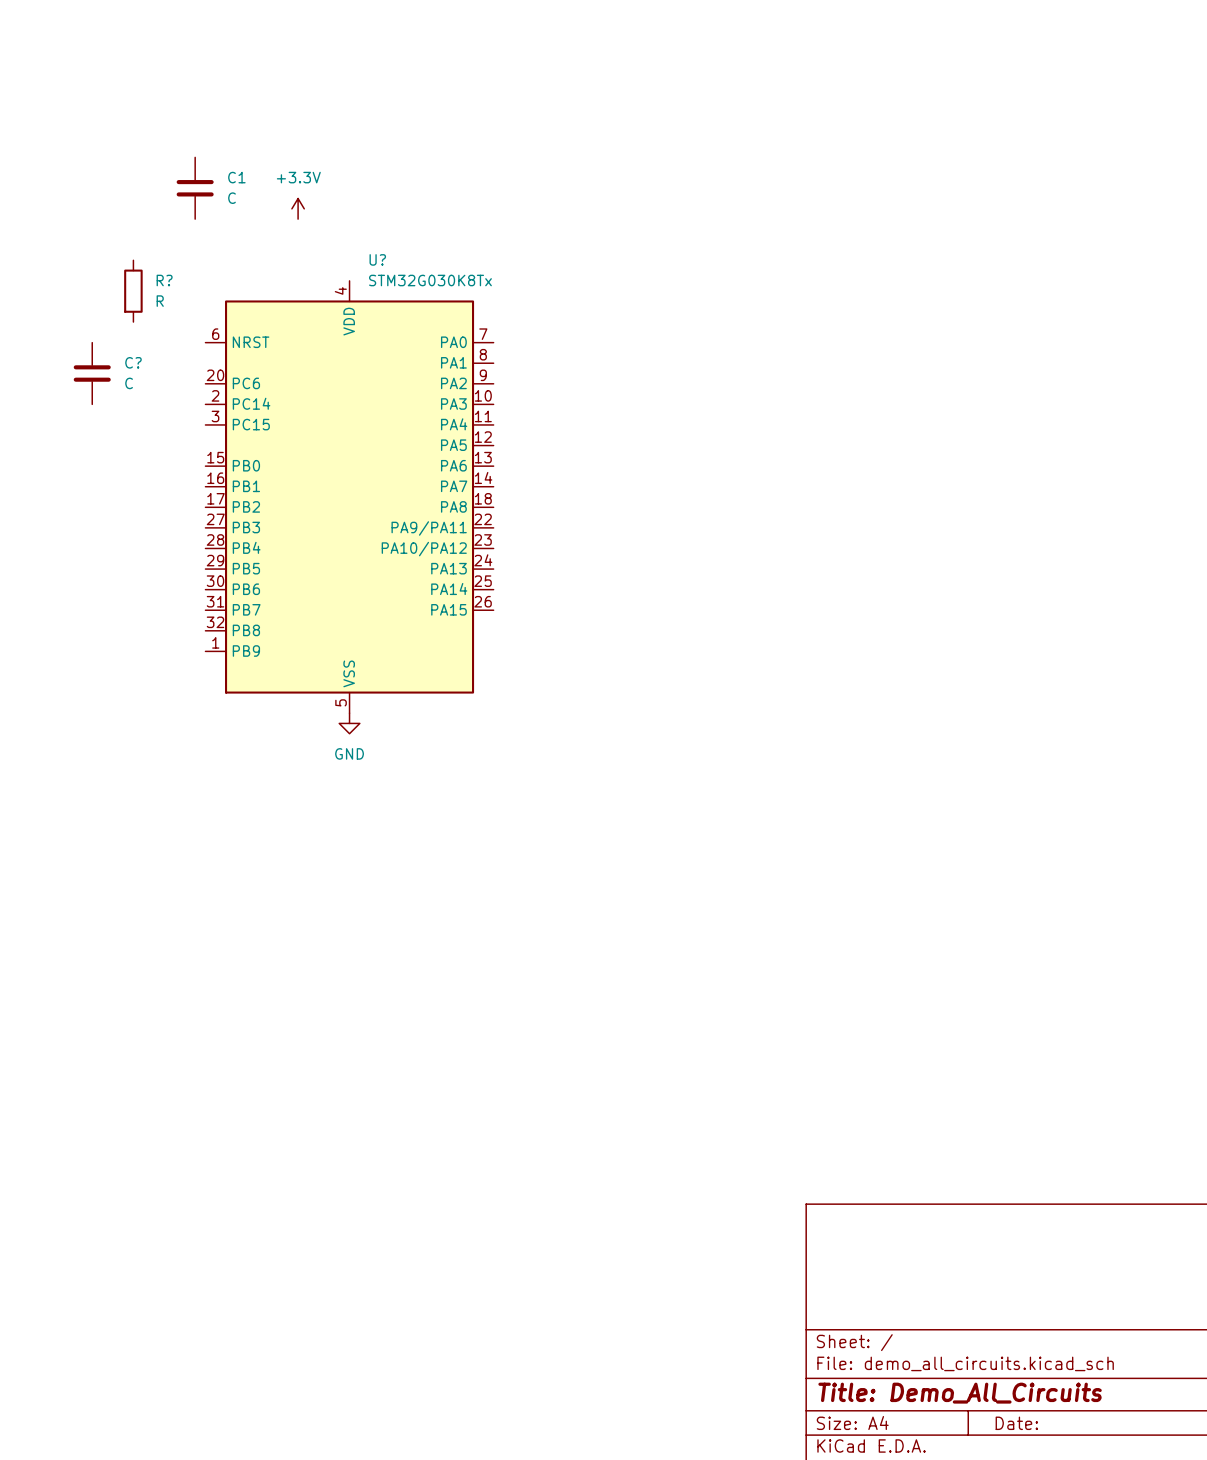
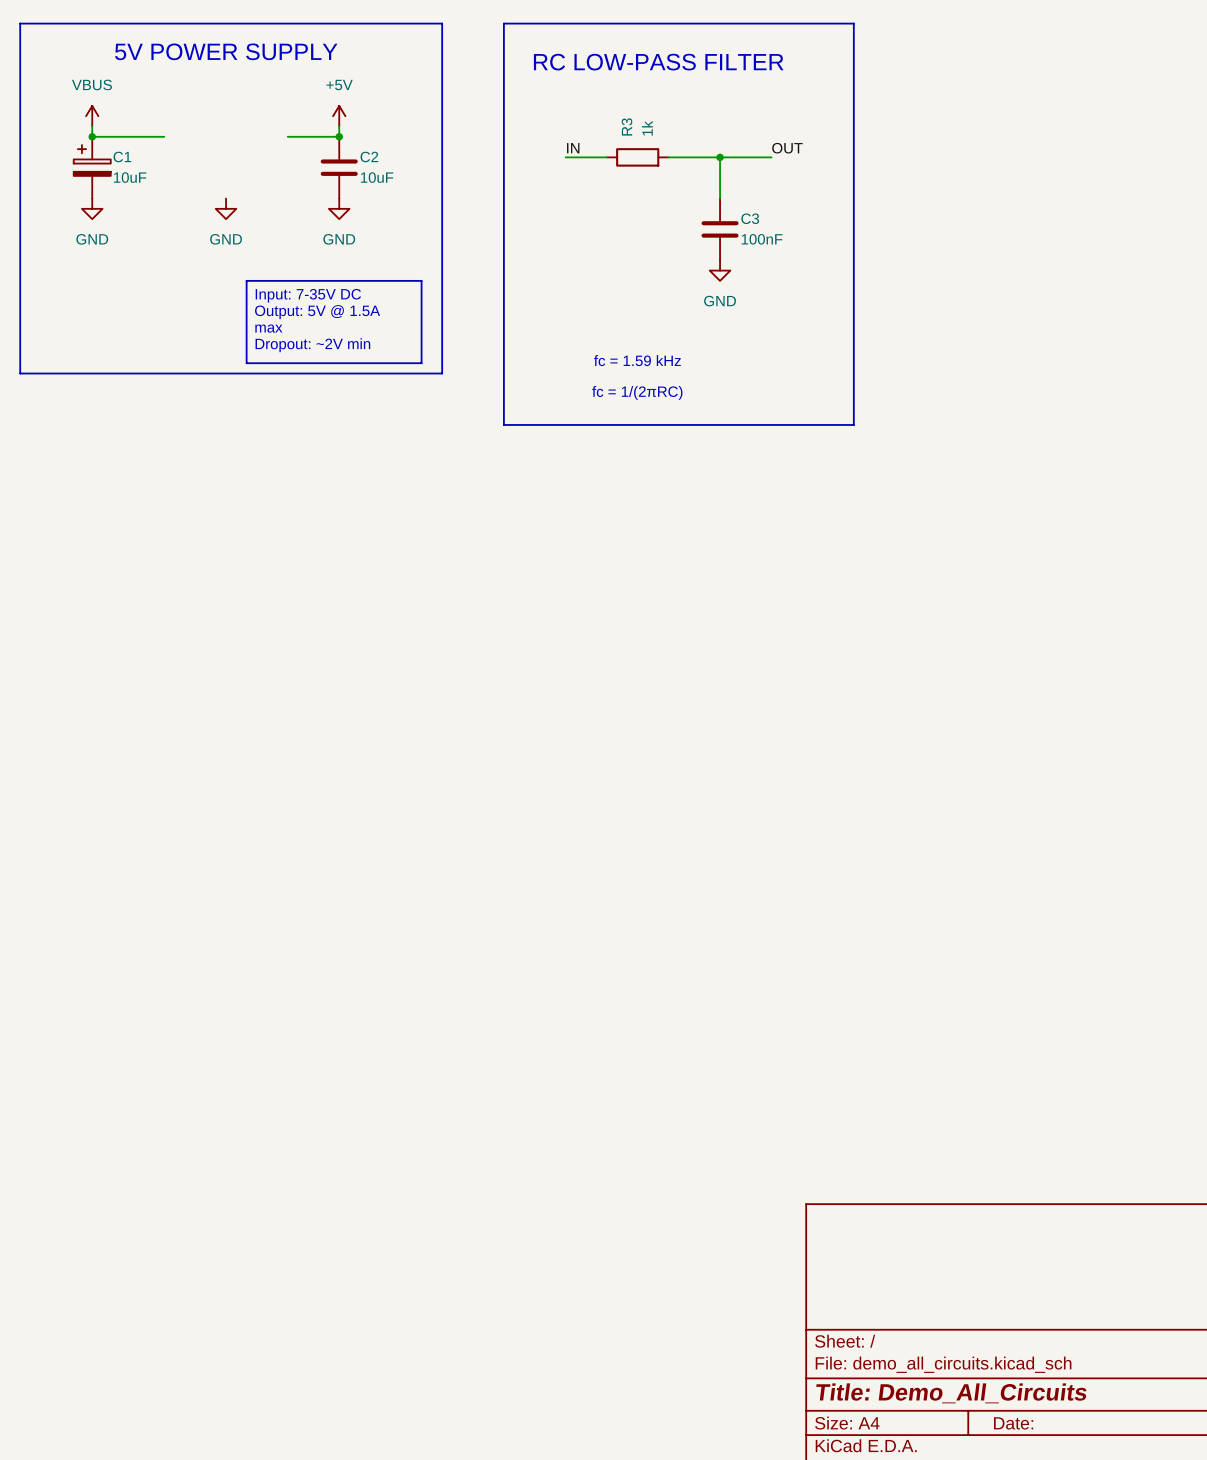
line: none -> (20, 23) (442, 23) (442, 373) (20, 373) (20, 23)
line: none -> (503, 23) (853, 23) (853, 424) (503, 424) (503, 23)
text: none -> 5V POWER SUPPLY (226, 51)
text: none -> RC LOW-PASS FILTER (658, 62)
power symbol: none -> VBUS (92, 116)
power symbol: none -> +5V (339, 116)
wire: none -> (92, 126) (92, 136) (164, 136)
wire: none -> (339, 126) (339, 136) (287, 136)
junction: none -> (92, 136)
junction: none -> (339, 136)
label: none -> IN (573, 148)
label: none -> OUT (787, 148)
C1 symbol: [176, 157, 214, 220] -> [73, 136, 111, 199]
wire: none -> (565, 157) (606, 157)
R3: none -> 1k (637, 157)
wire: none -> (668, 157) (771, 157)
wire: none -> (720, 157) (720, 198)
junction: none -> (720, 157)
C2: none -> 10uF (339, 167)
C1 value: C (231, 198) -> 10uF (130, 177)
power symbol: none -> GND (92, 208)
power symbol: none -> GND (226, 208)
power symbol: +3.3V (298, 208) -> none
power symbol: none -> GND (339, 208)
C3: none -> 100nF (720, 229)
power symbol: none -> GND (720, 270)
line: none -> (246, 280) (421, 280) (421, 363) (246, 363) (246, 280)
R?: R (133, 291) -> none
text: none -> Input: 7-35V DC (308, 295)
text: none -> Output: 5V @ 1.5A (317, 312)
text: none -> max (268, 328)
text: none -> Dropout: ~2V min (312, 345)
text: none -> fc = 1.59 kHz (637, 360)
C?: C (92, 373) -> none
text: none -> fc = 1/(2πRC) (637, 392)
U?: STM32G030K8Tx (349, 497) -> none
power symbol: GND (349, 723) -> none

